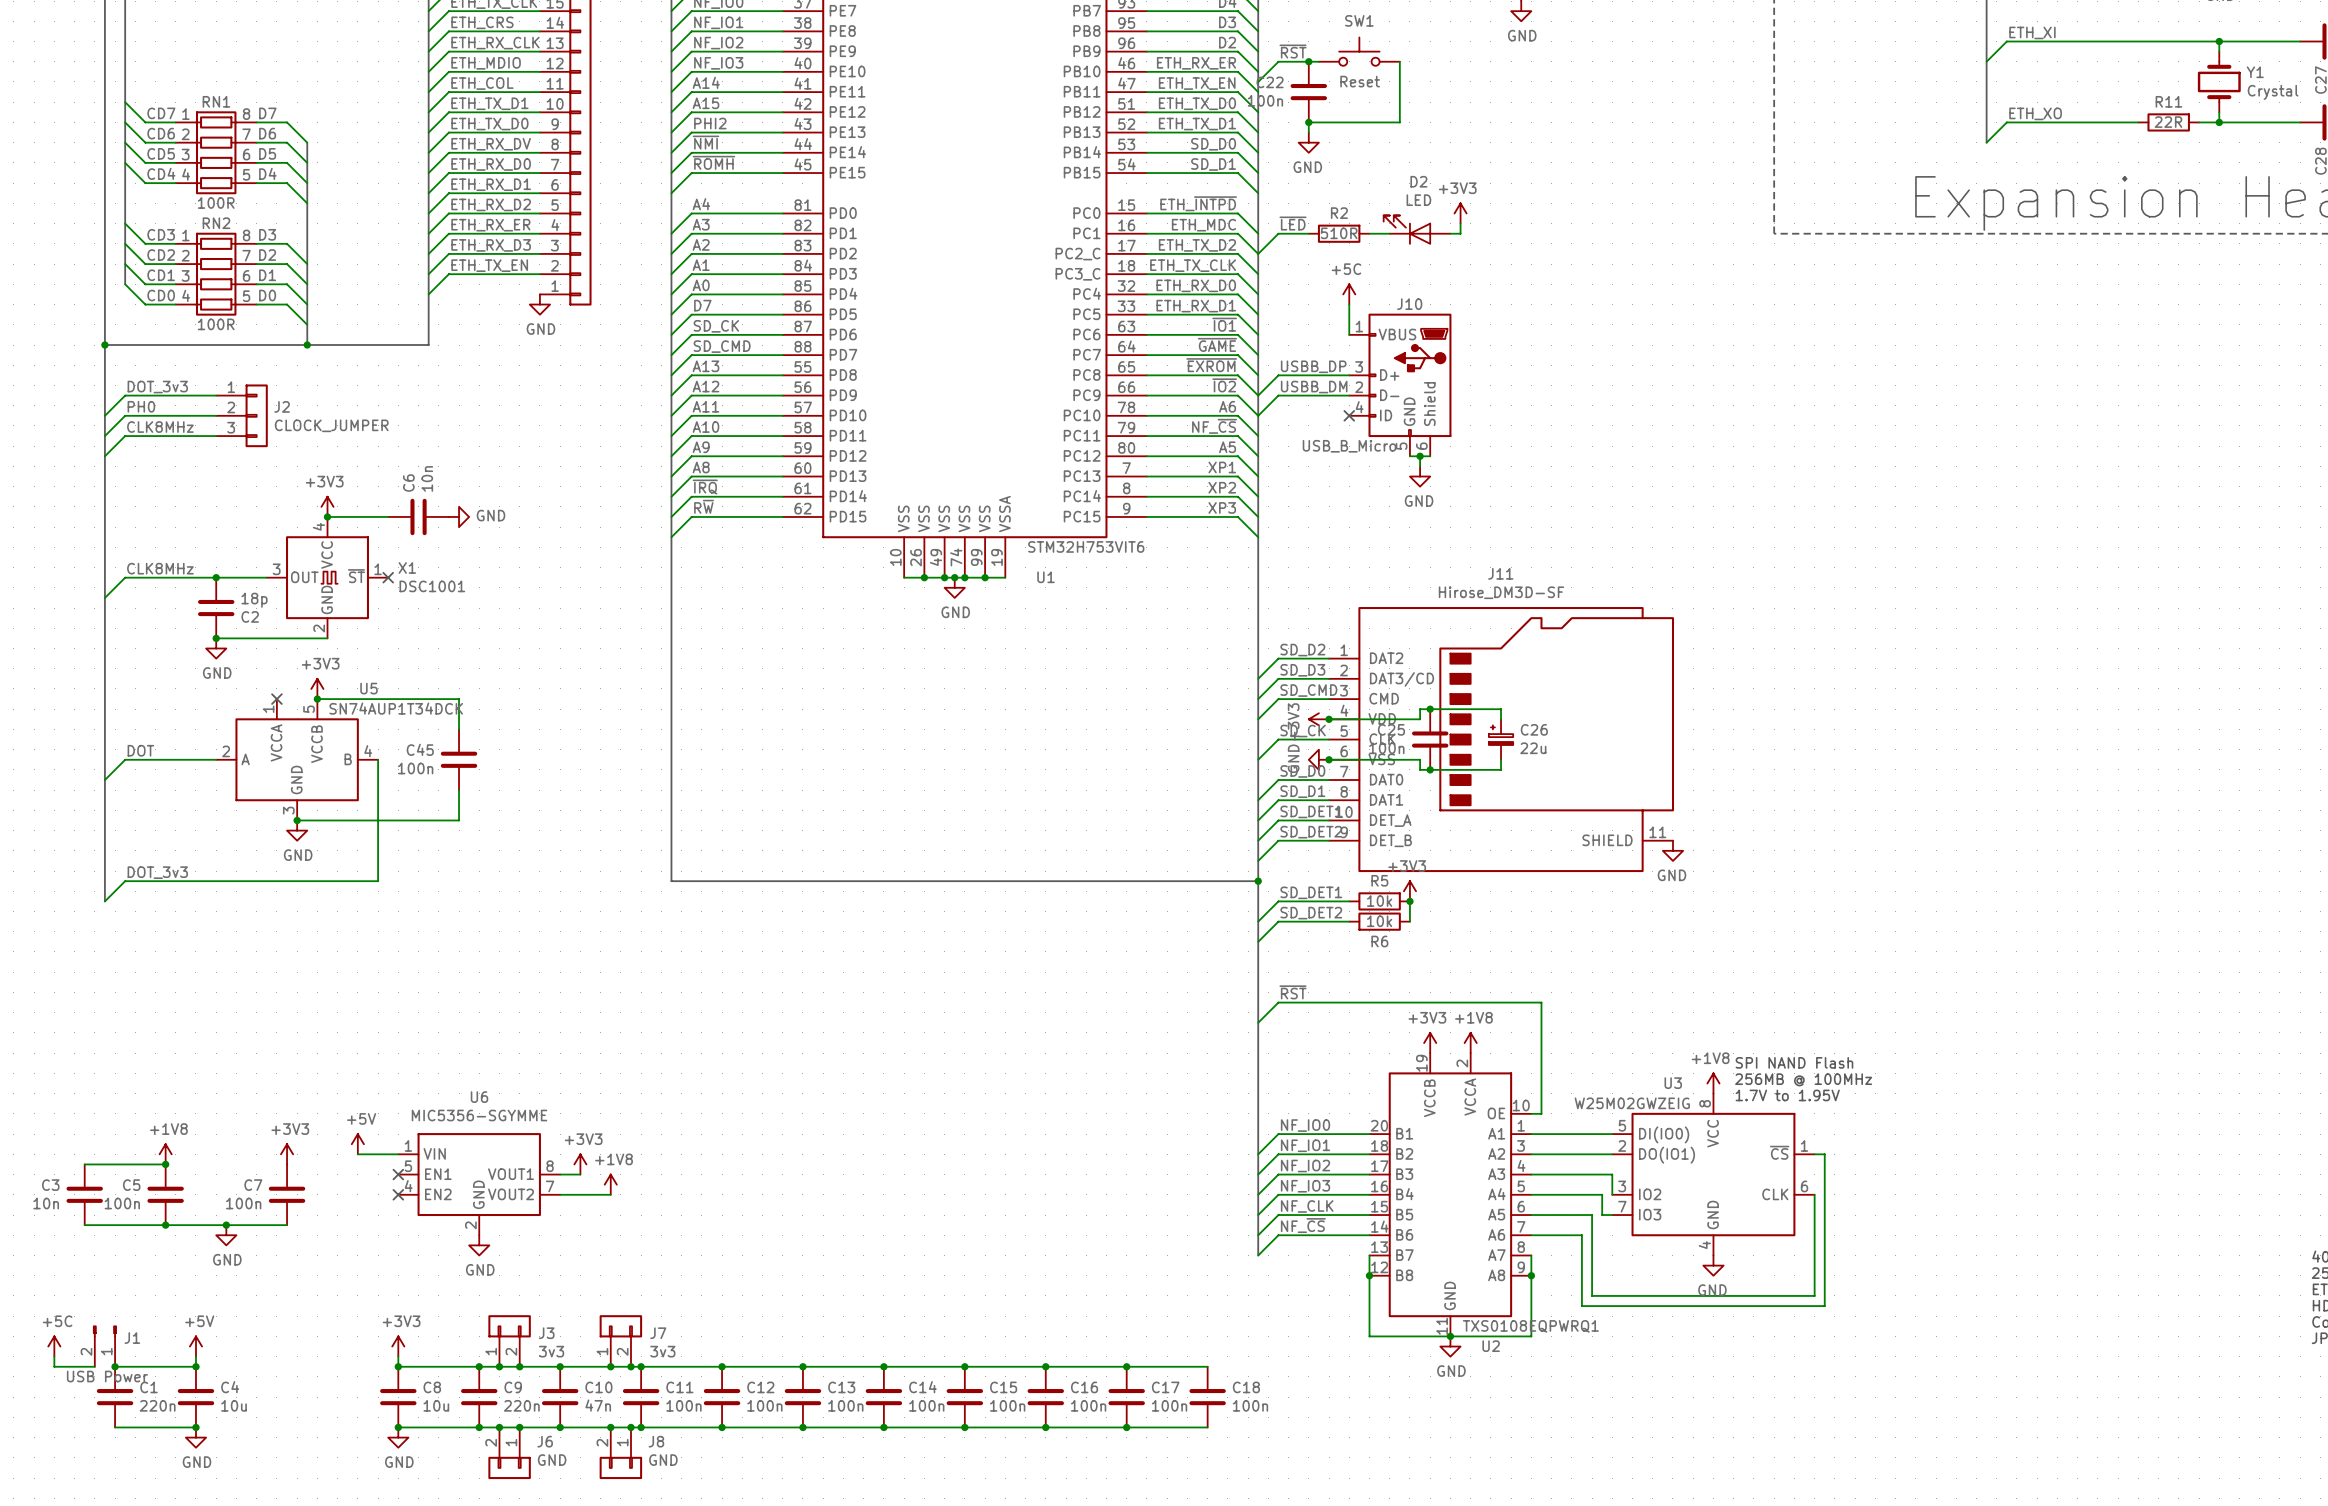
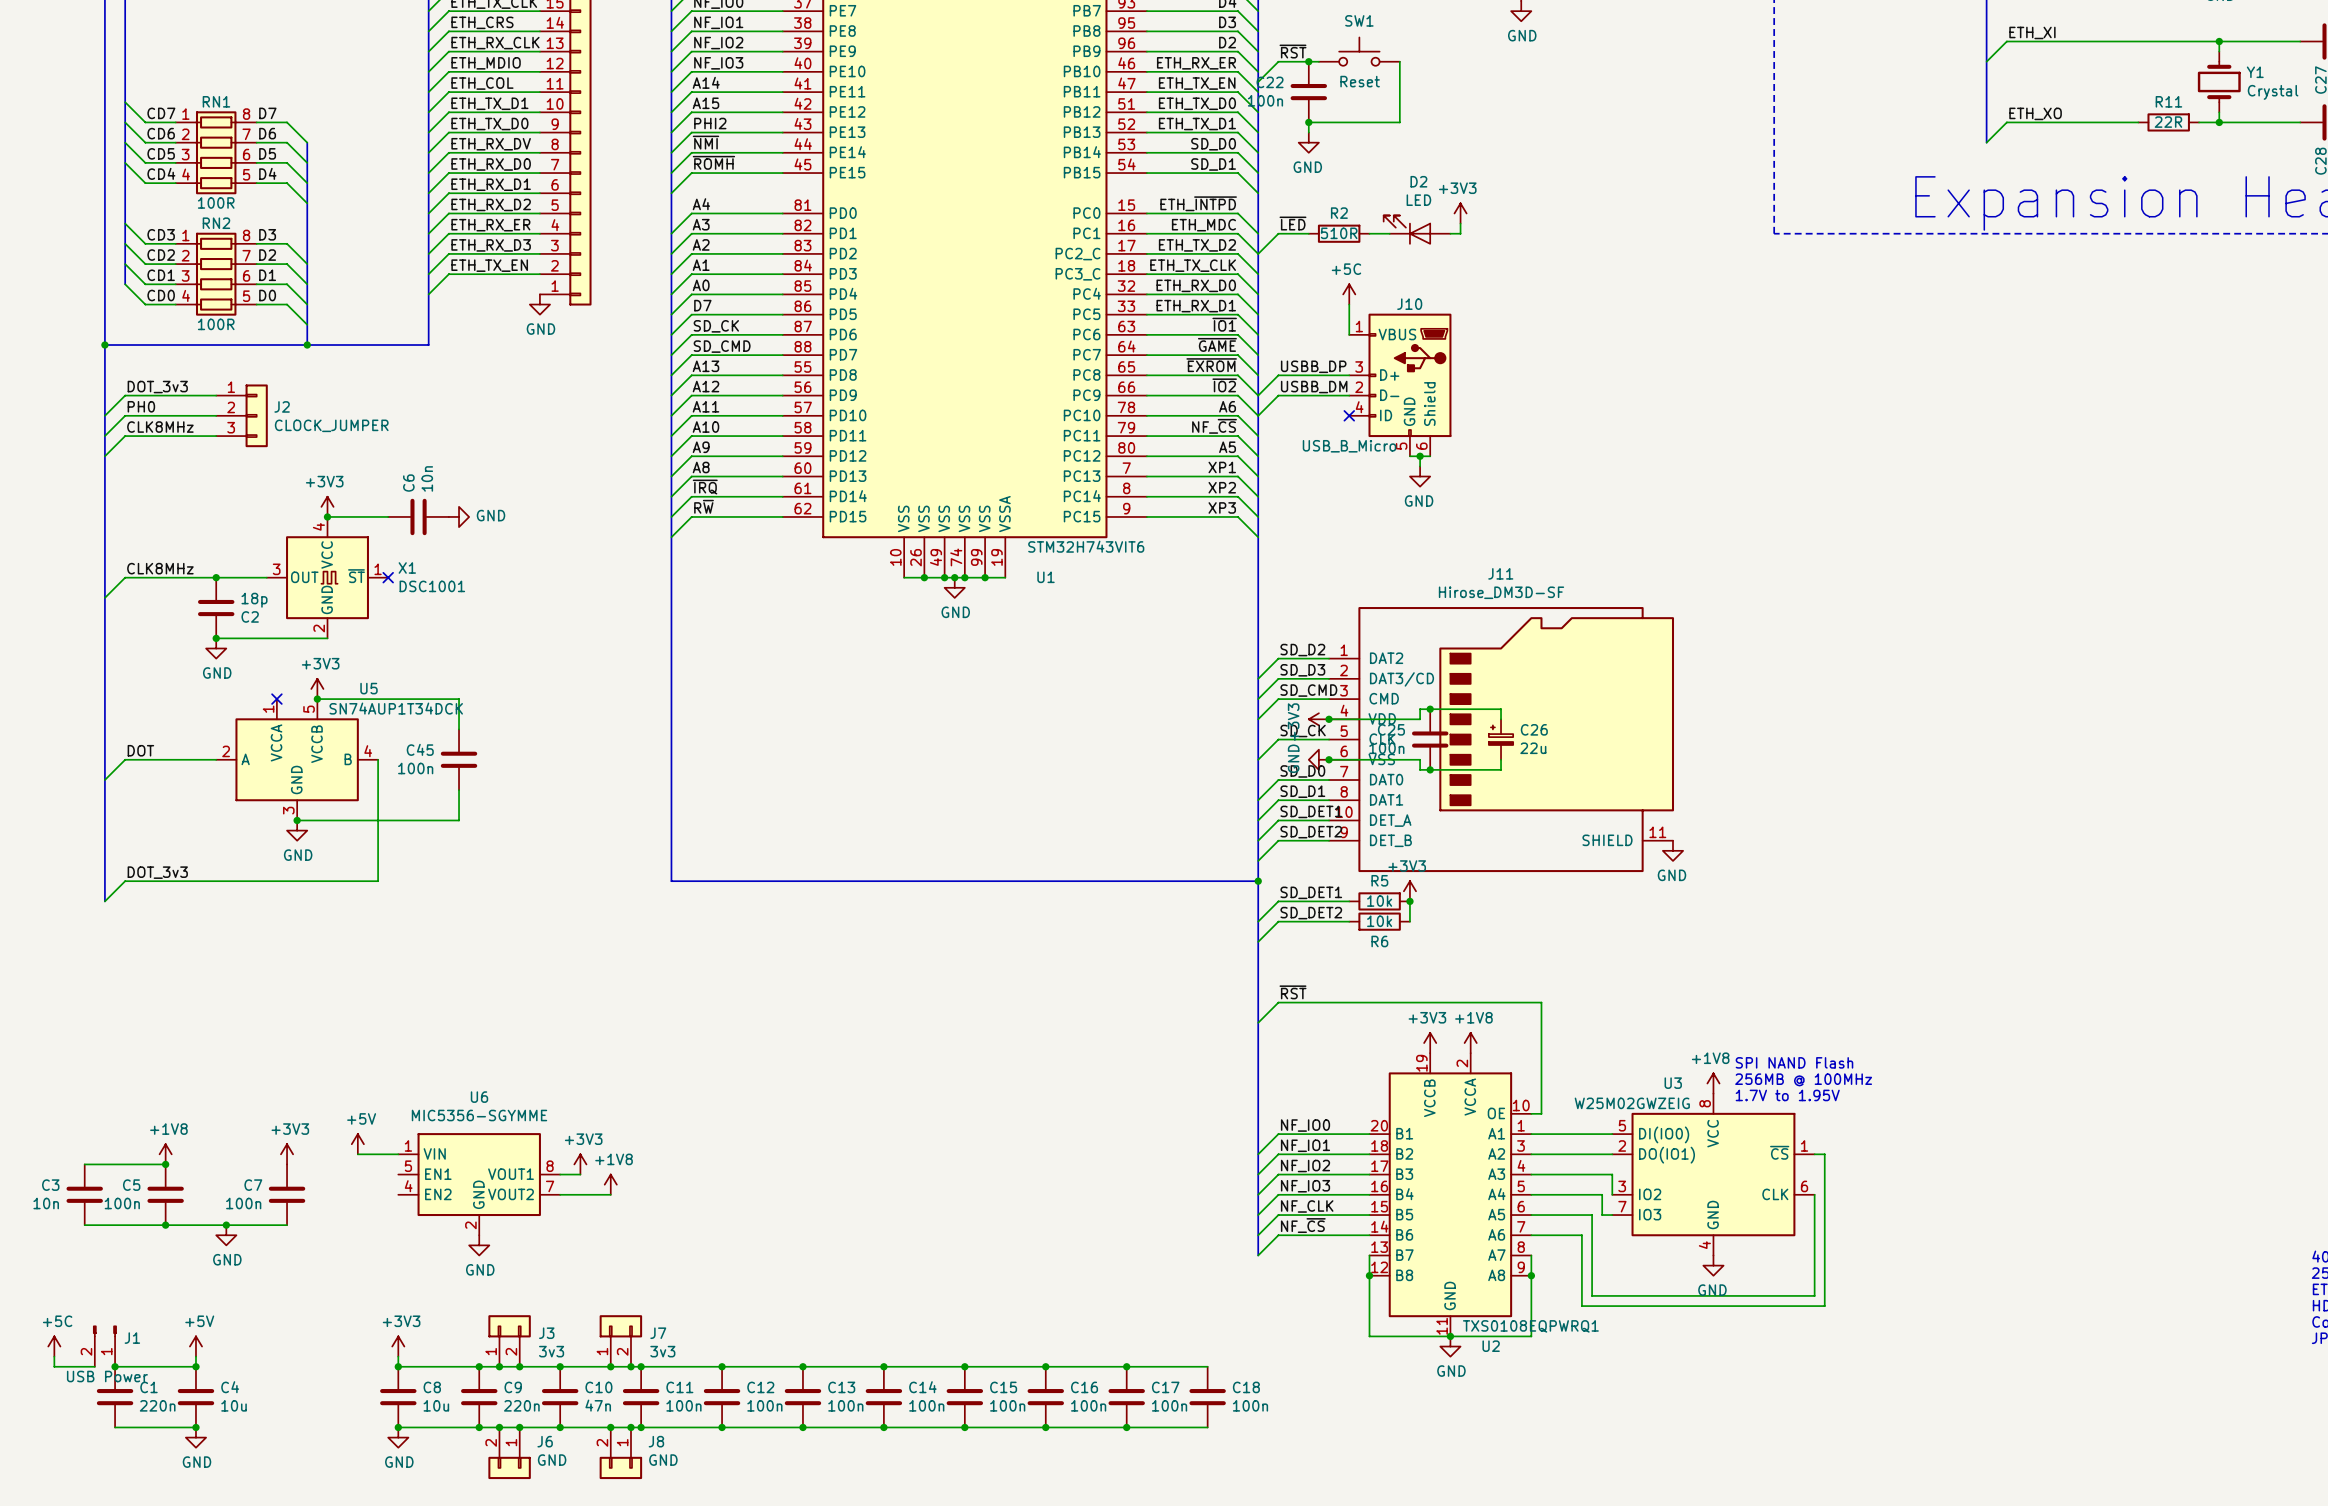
U1 value: STM32H753VIT6 (1086, 546) -> STM32H743VIT6 (1086, 546)
no-connect mark: (398, 1174) -> none
no-connect mark: (398, 1194) -> none

